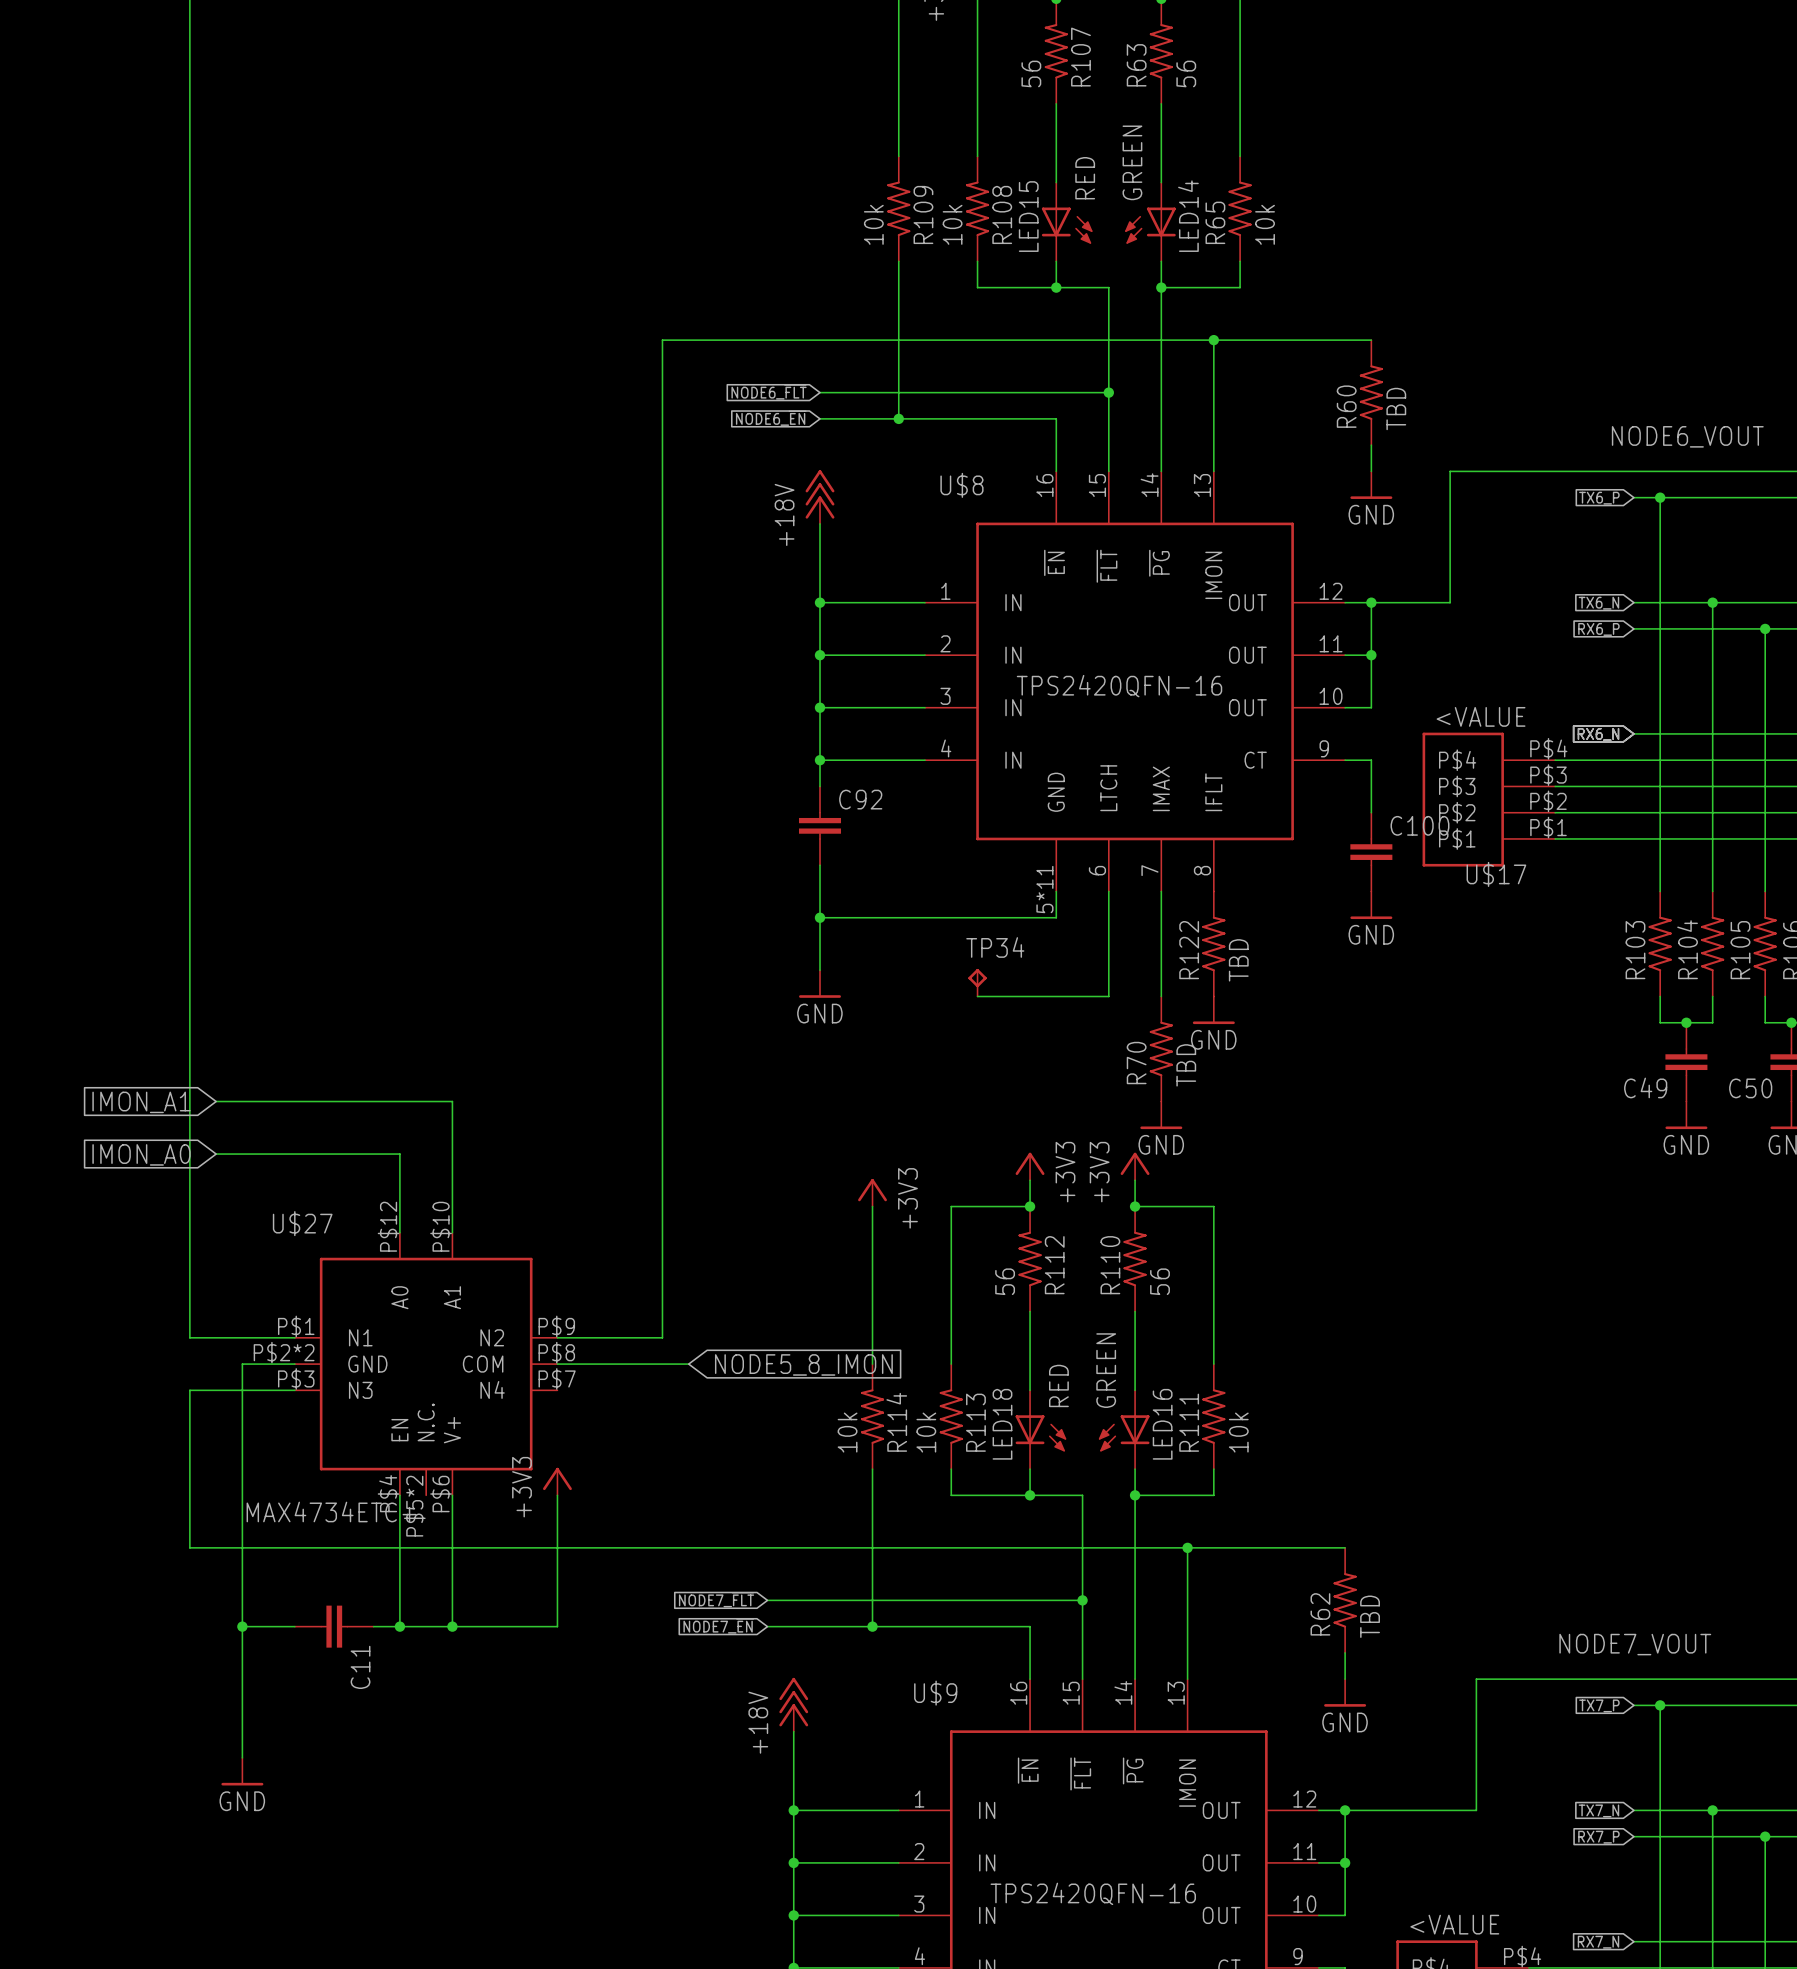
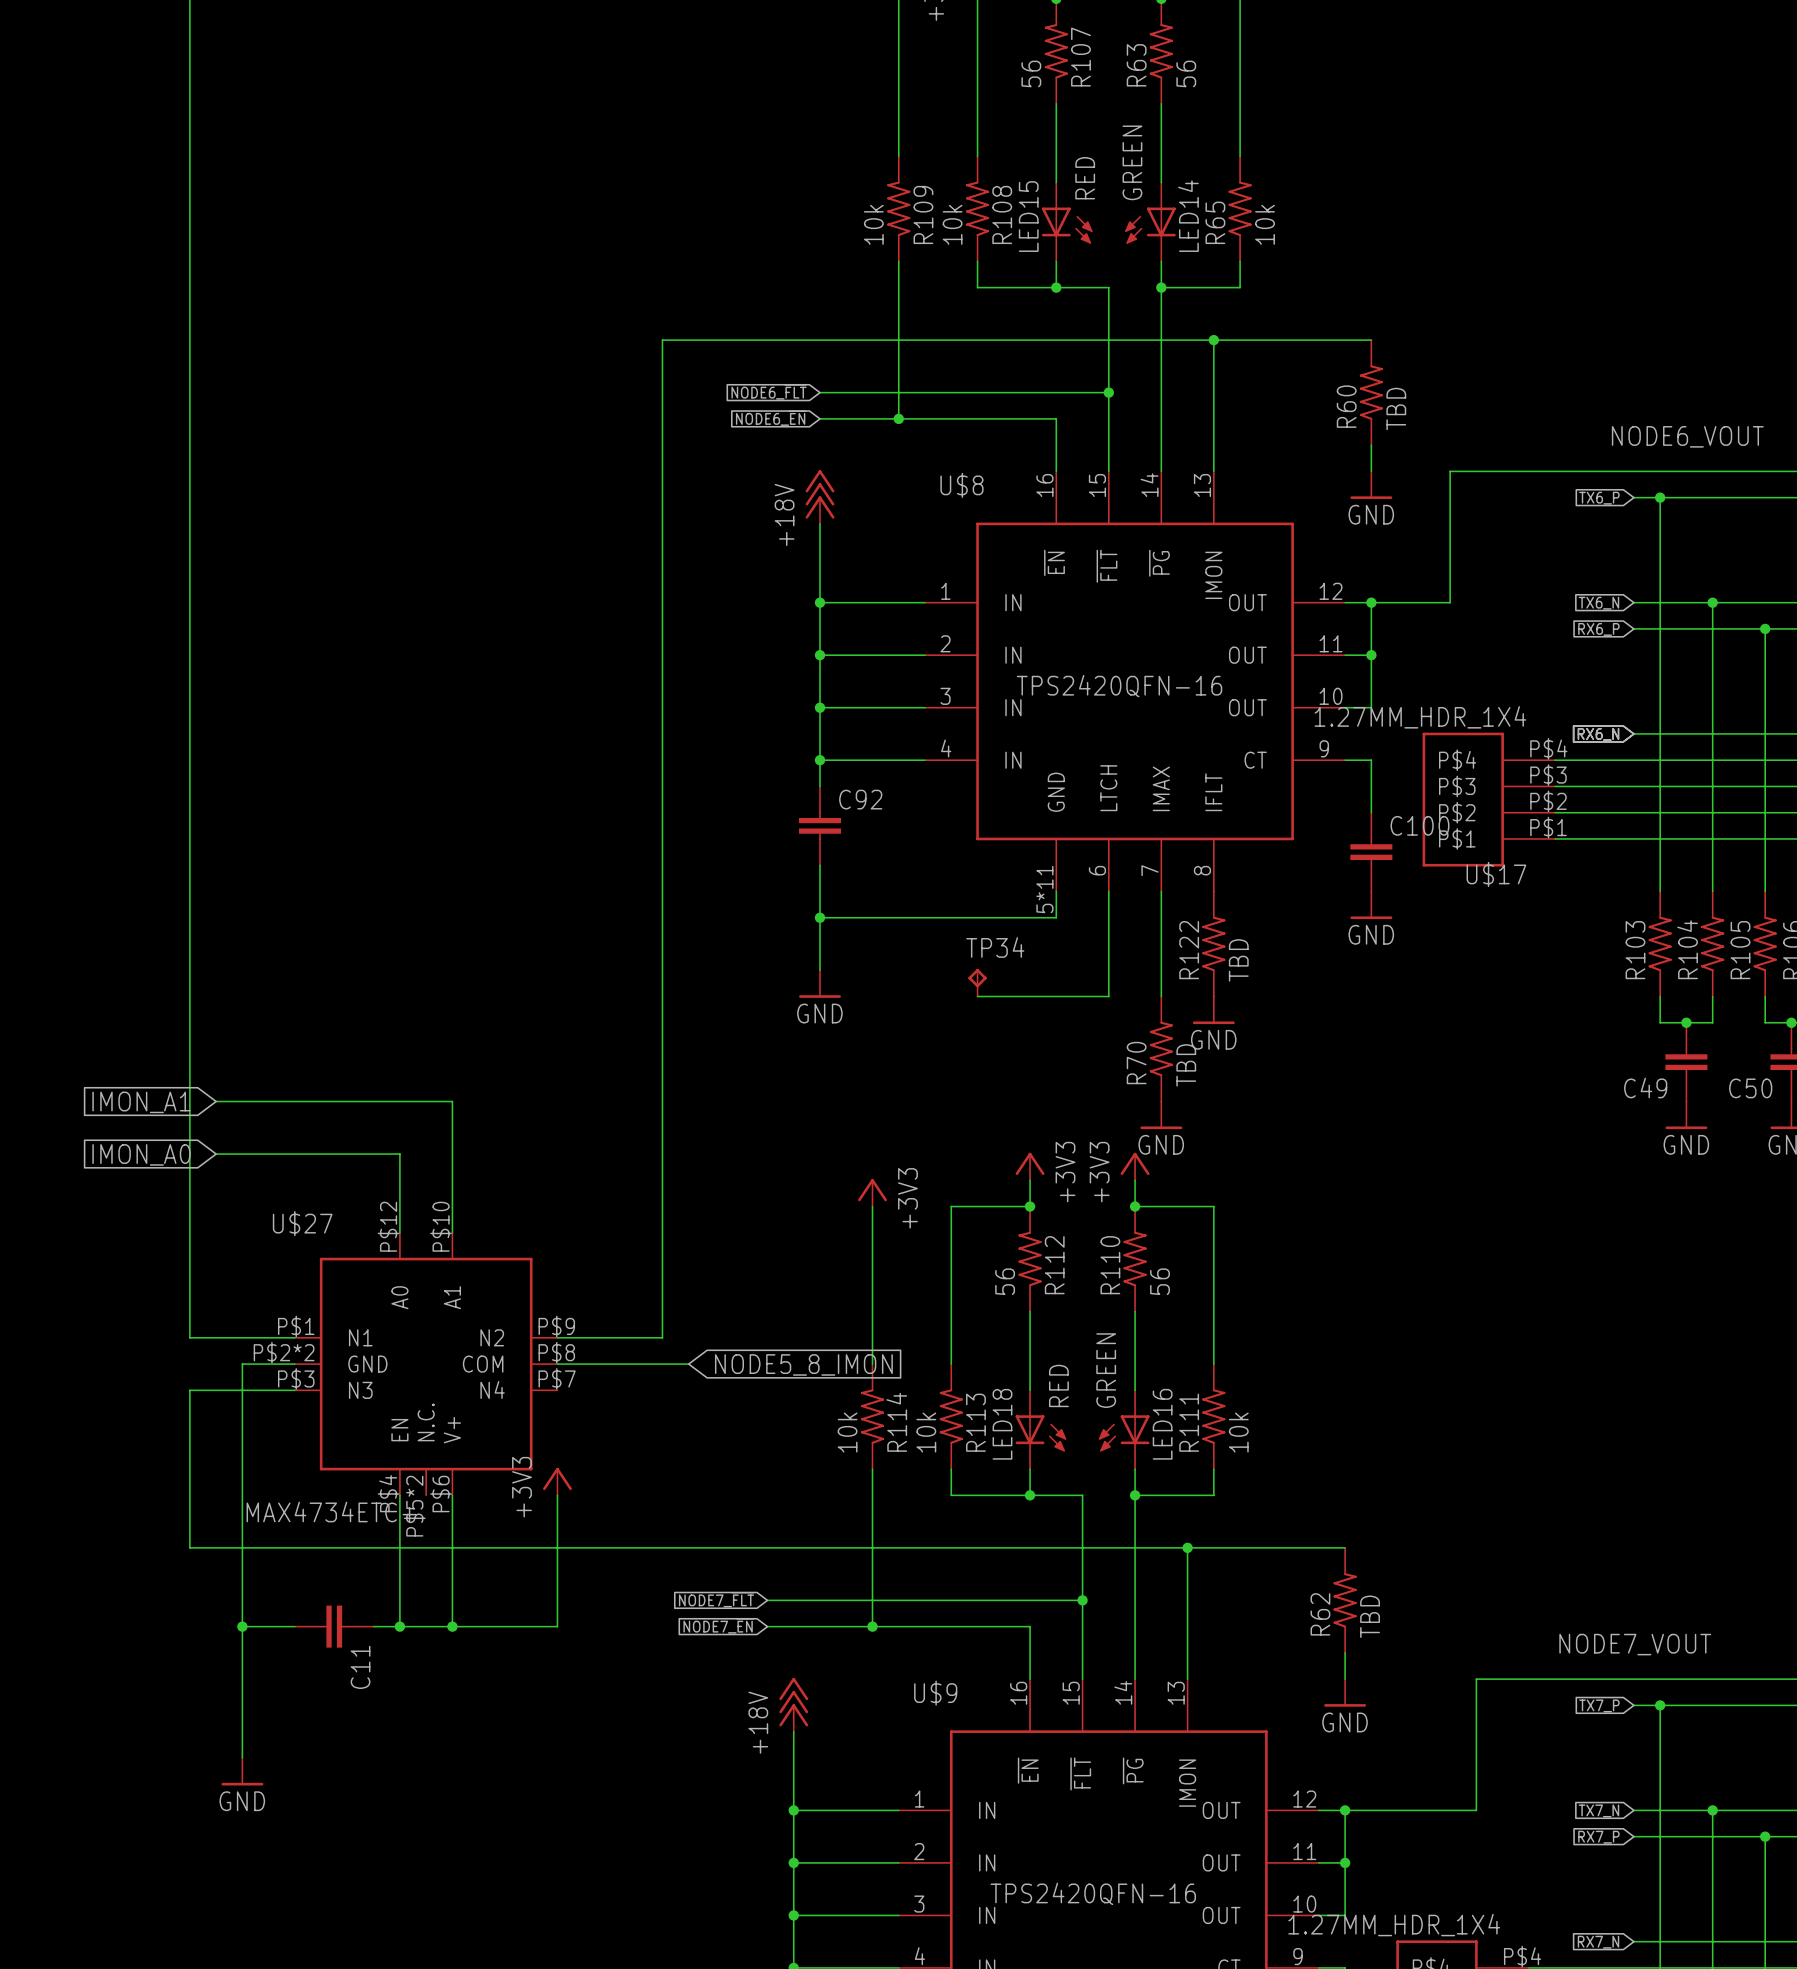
U$17 text: <VALUE (1481, 716) -> none
U$17 value: none -> 1.27MM_HDR_1X4 (1420, 717)
part text: <VALUE (1454, 1924) -> none
part value: none -> 1.27MM_HDR_1X4 (1394, 1925)

